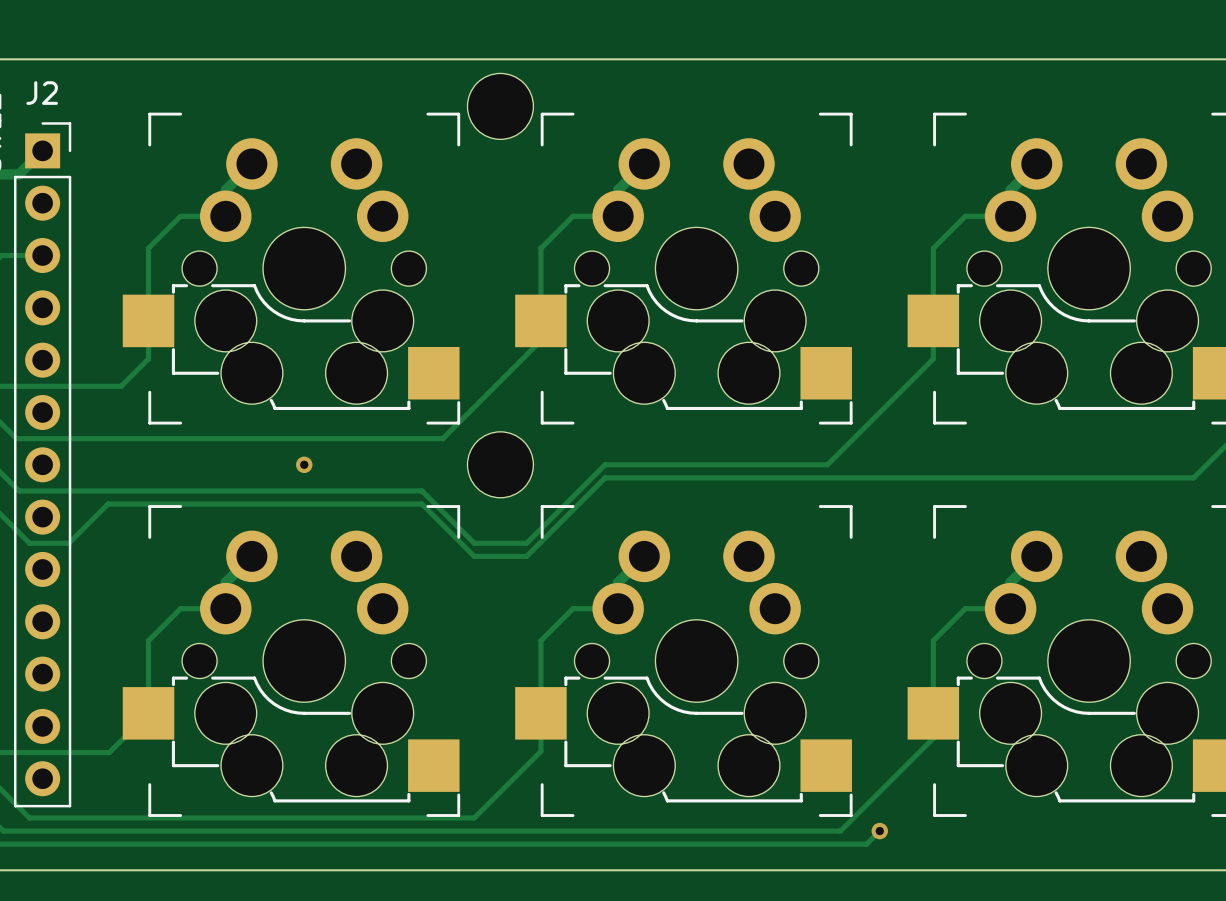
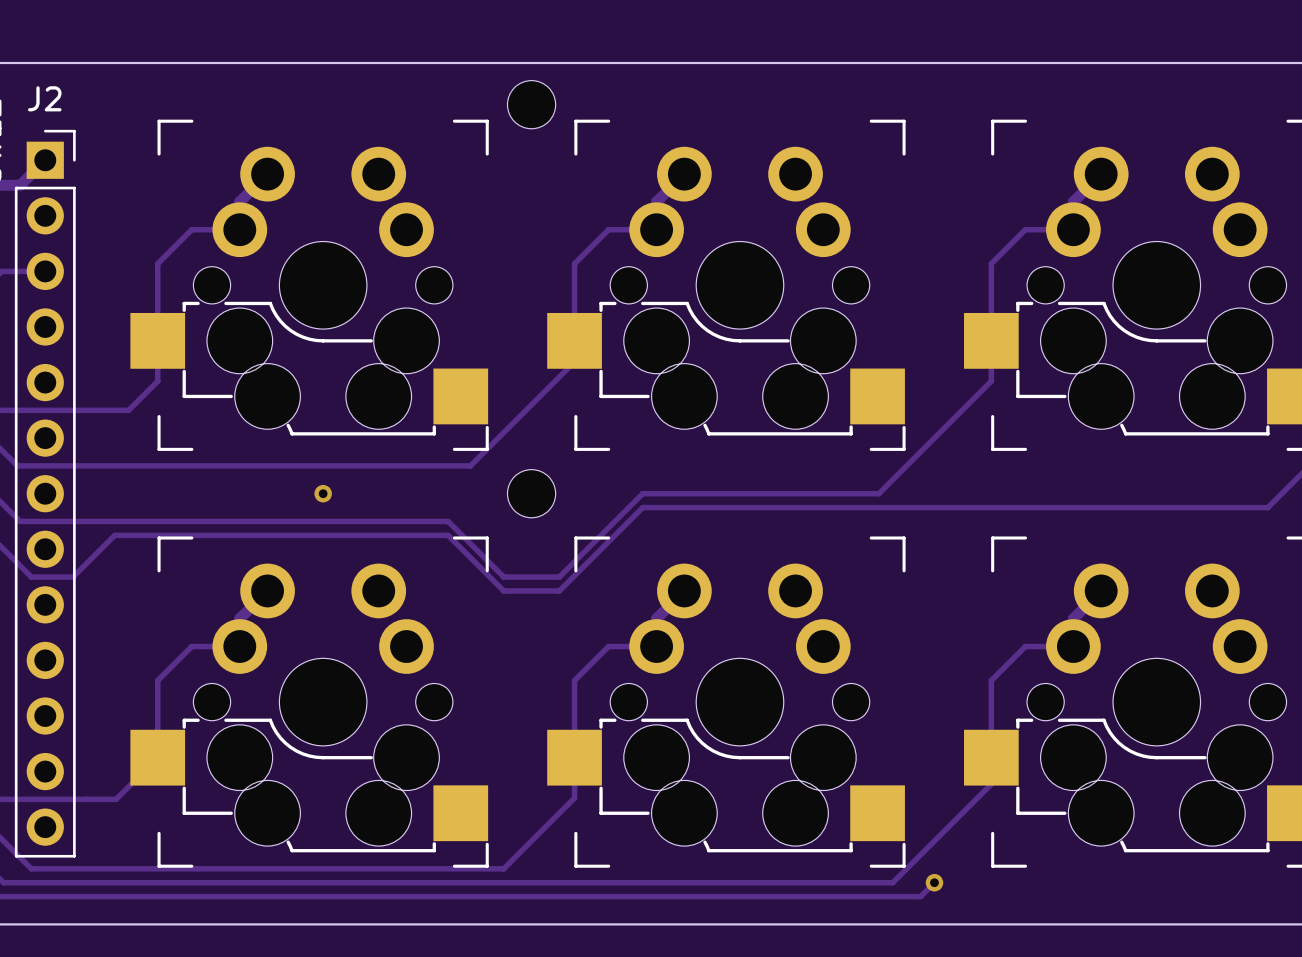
part footprint: [467, 73, 534, 140] -> [507, 80, 556, 129]
part footprint: [467, 431, 534, 498] -> [507, 469, 556, 518]

